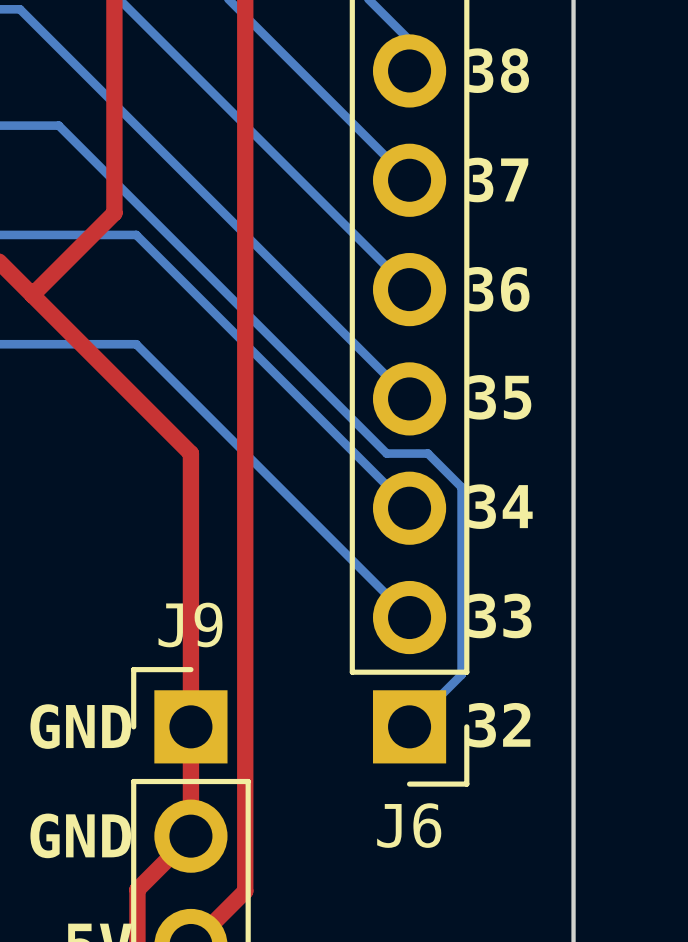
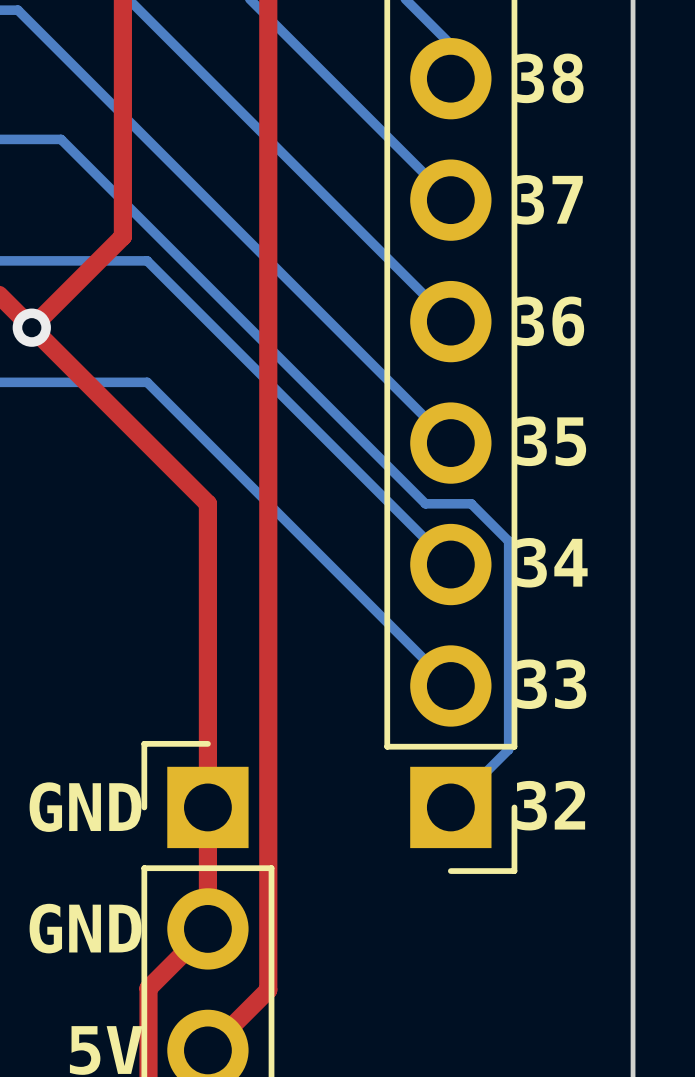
via: none -> (31, 327)
J9 name: J9 (190, 625) -> none
J6 name: J6 (409, 825) -> none

